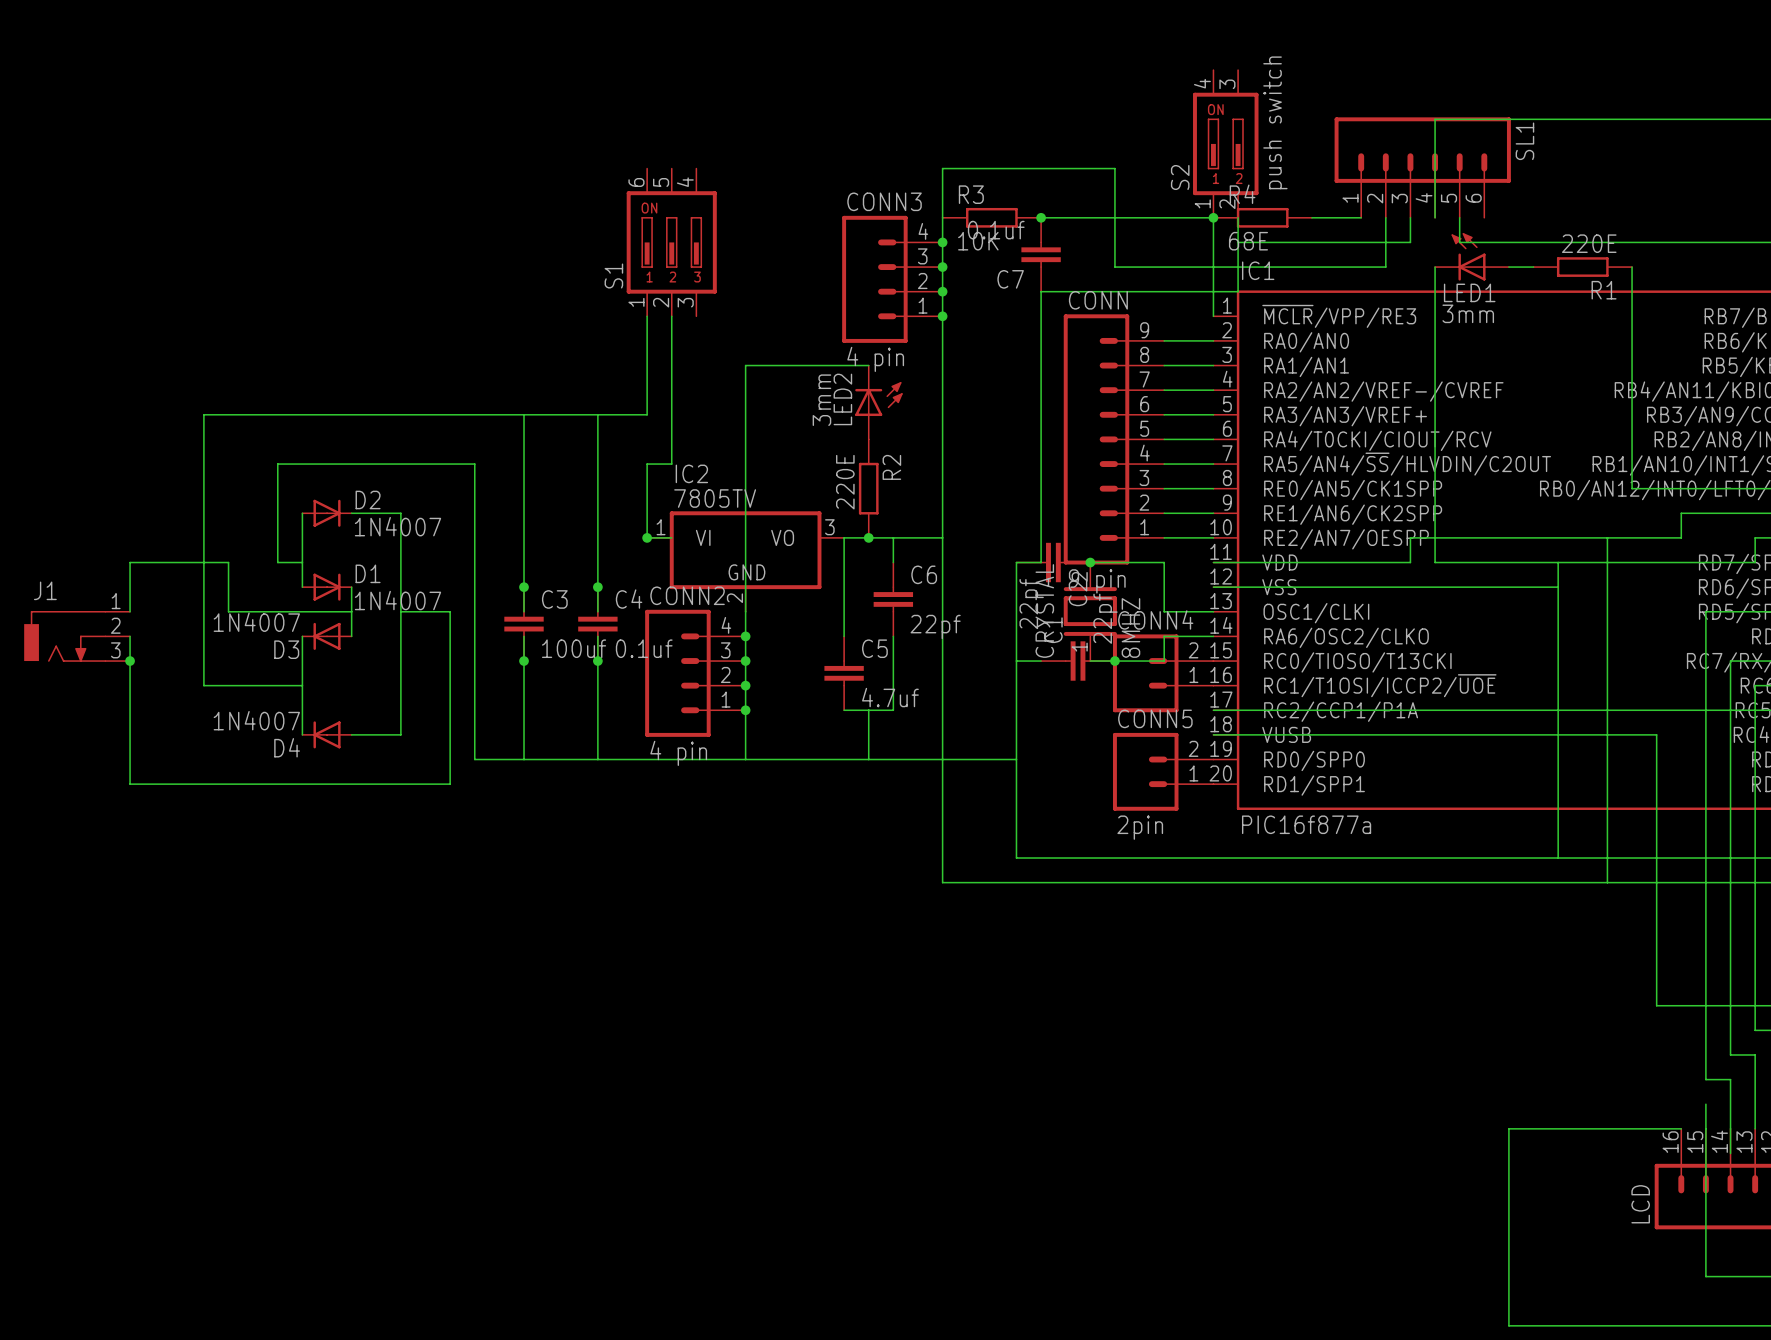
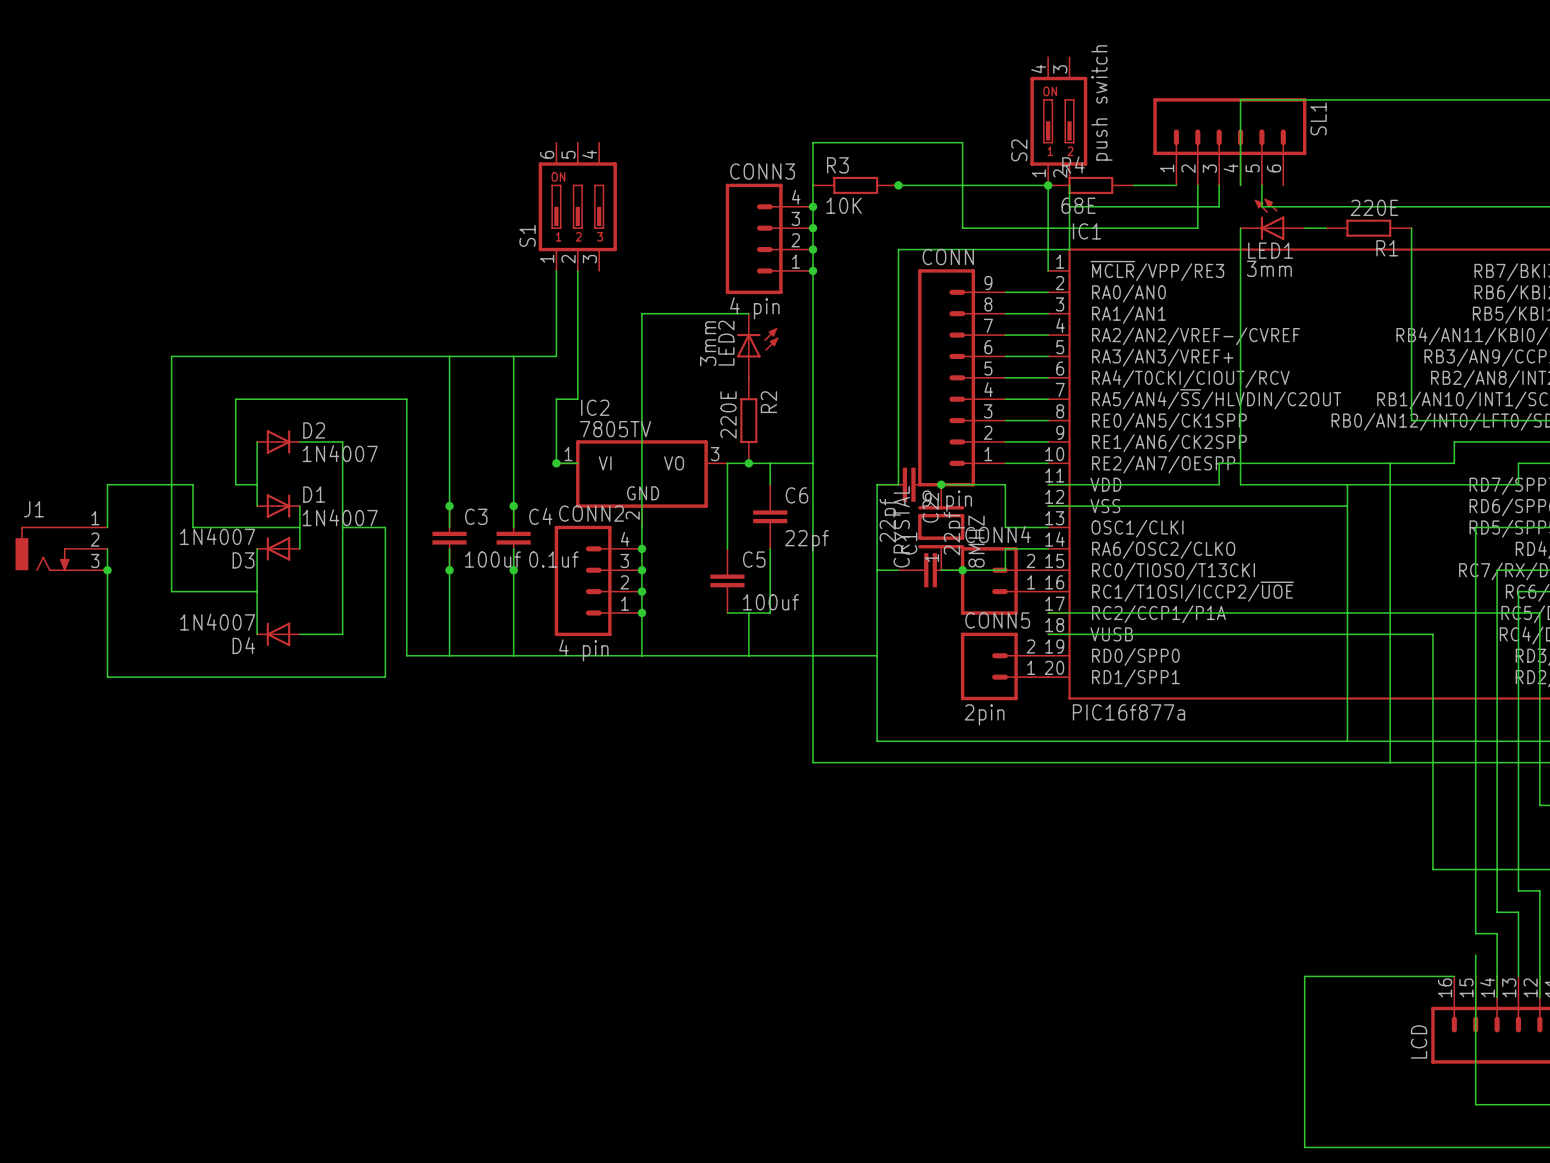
C7: 0.1uf (1041, 254) -> none
C5 value: 4.7uf (890, 697) -> 100uf (770, 602)

